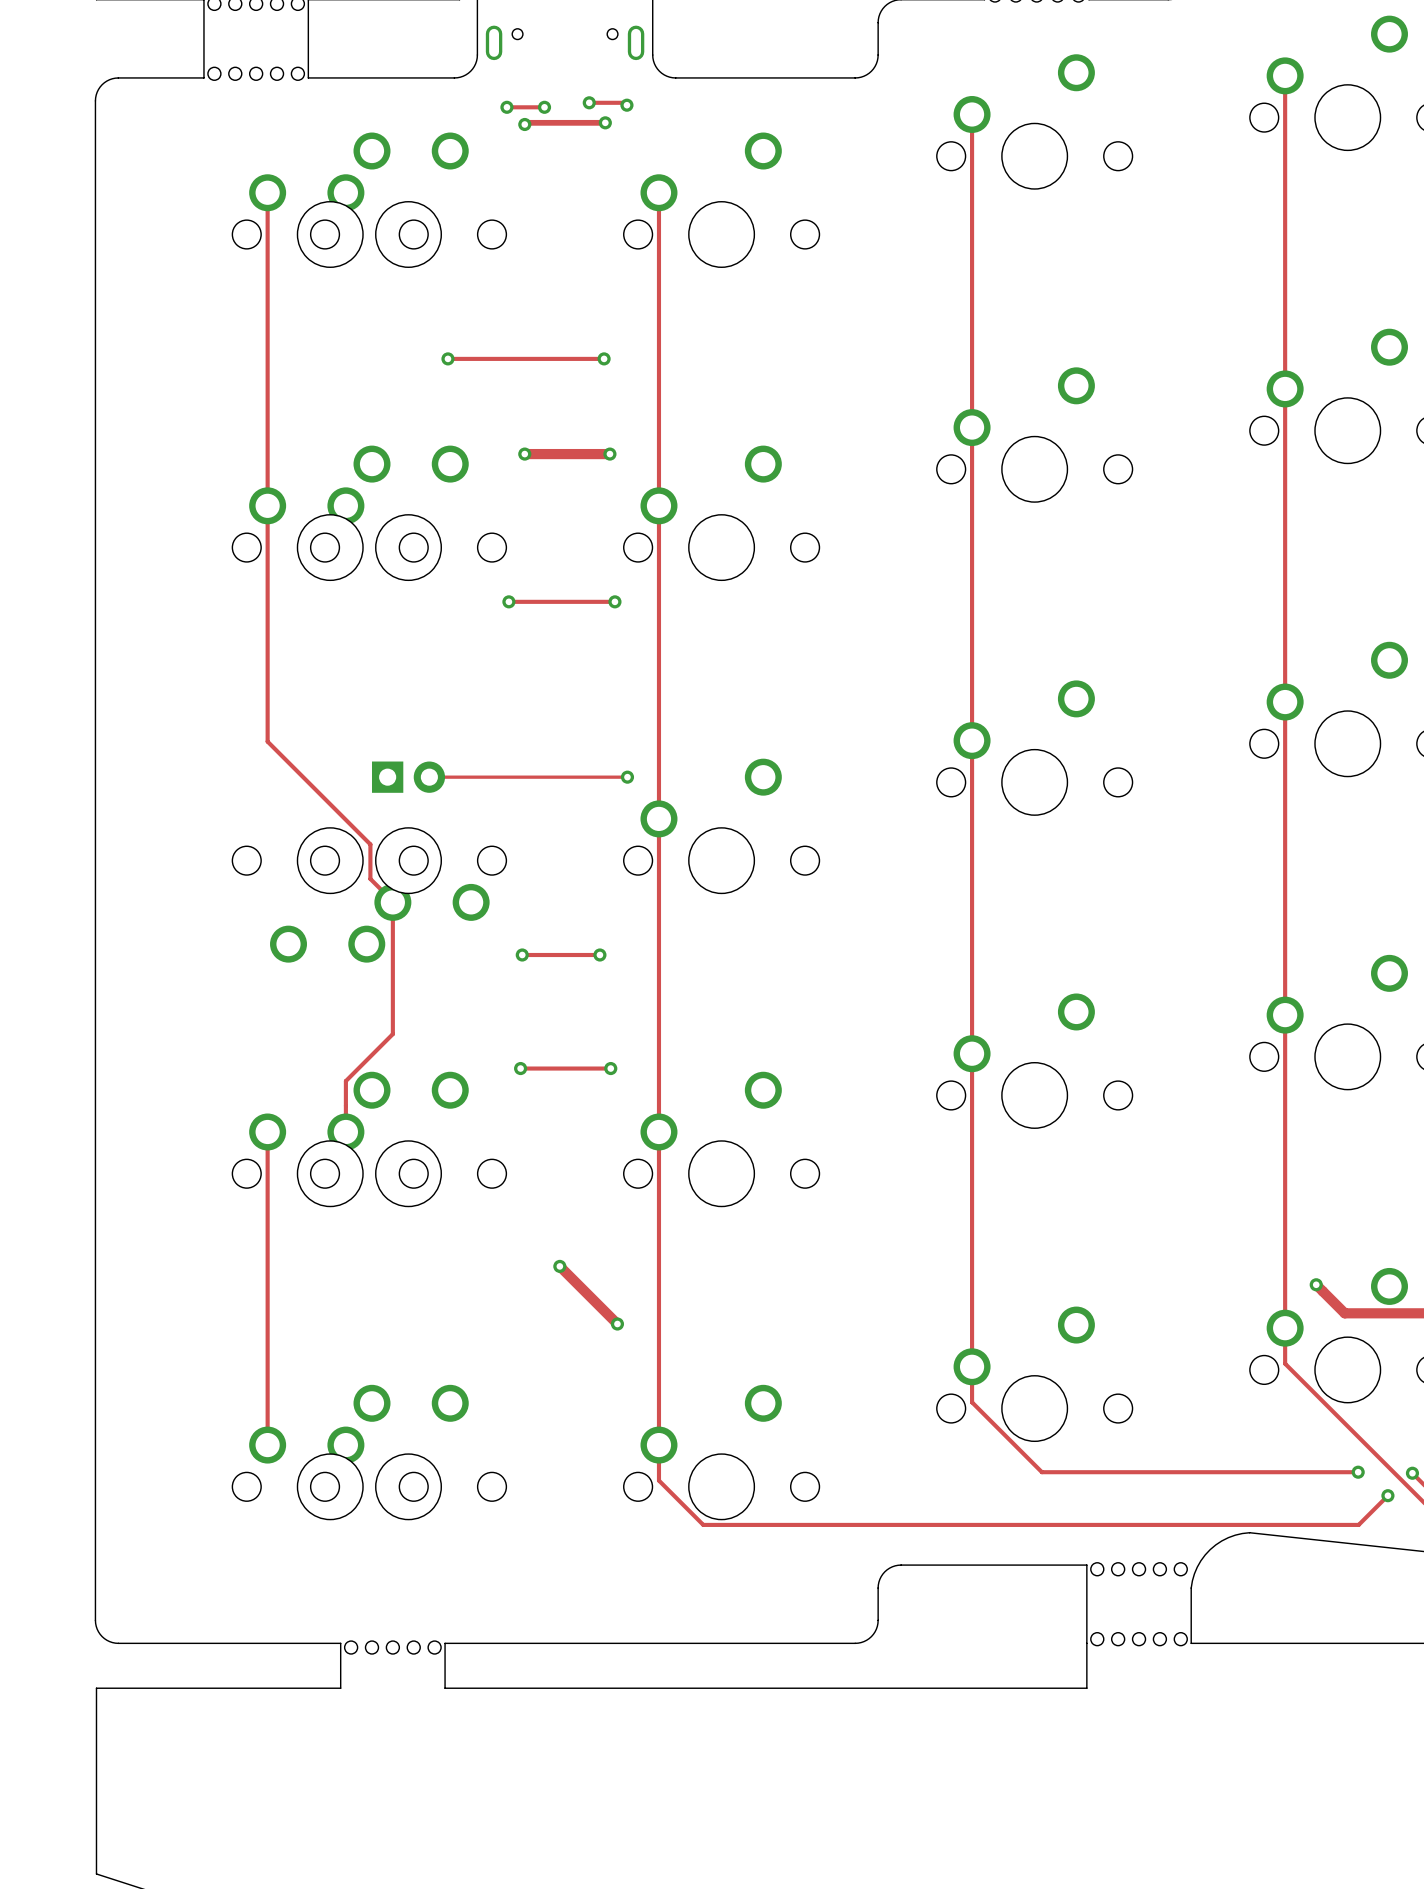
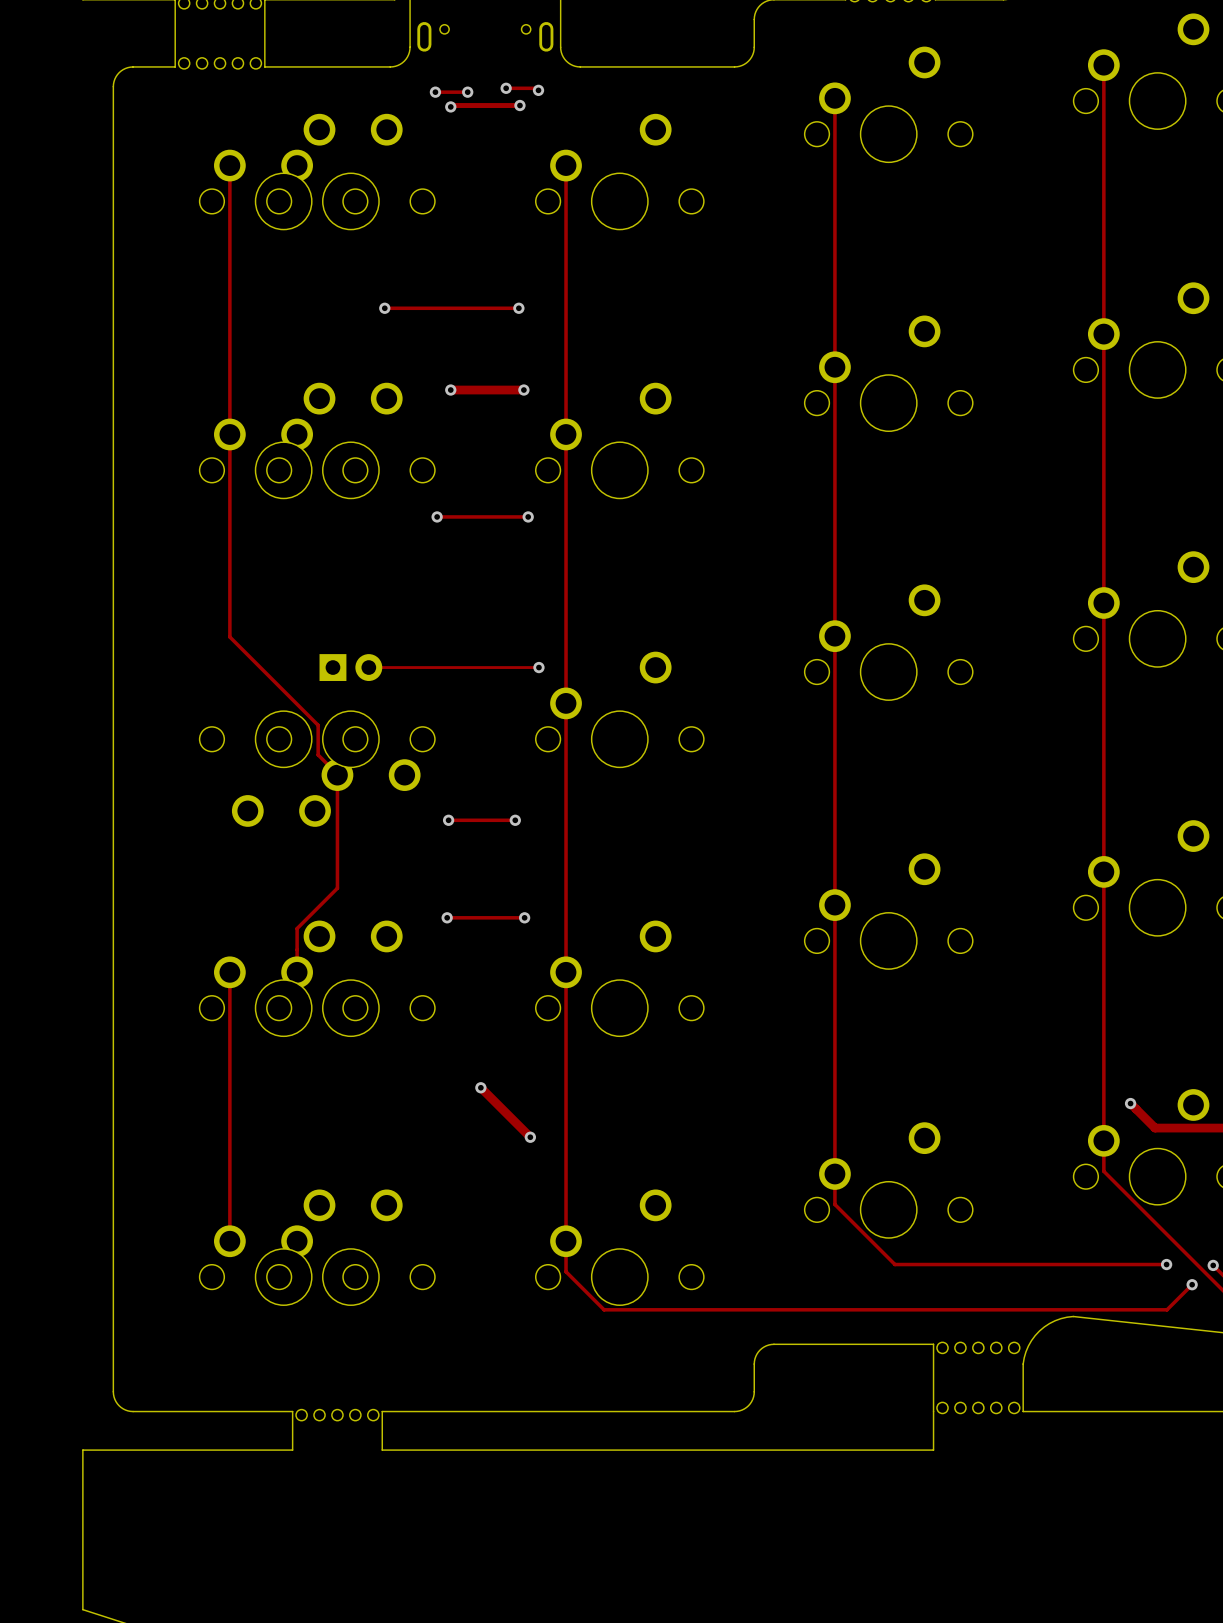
board edge: (154, 77) (109, 79) (100, 86) (95, 100) (95, 1620) (100, 1634) (109, 1641) (154, 1643) -> (113, 86) (113, 1391) (114, 1399) (119, 1405) (125, 1410) (133, 1411)
board edge: none -> (133, 66) (125, 68) (119, 72) (114, 79) (113, 86)

